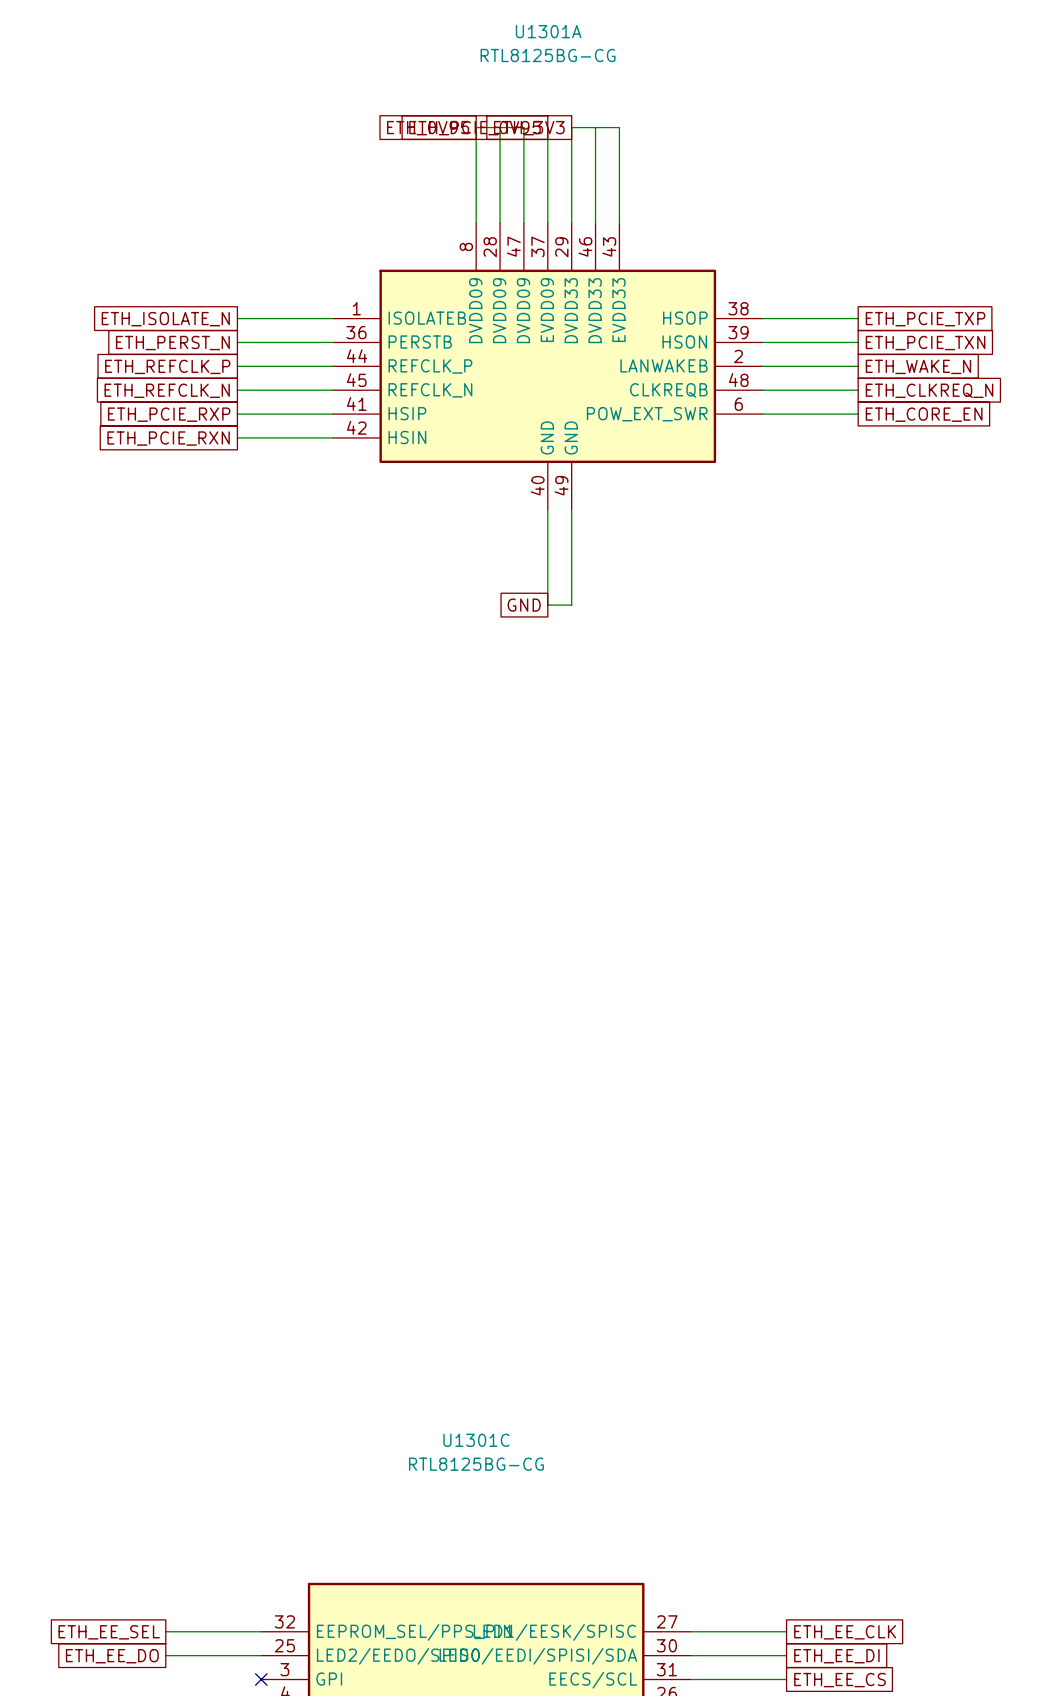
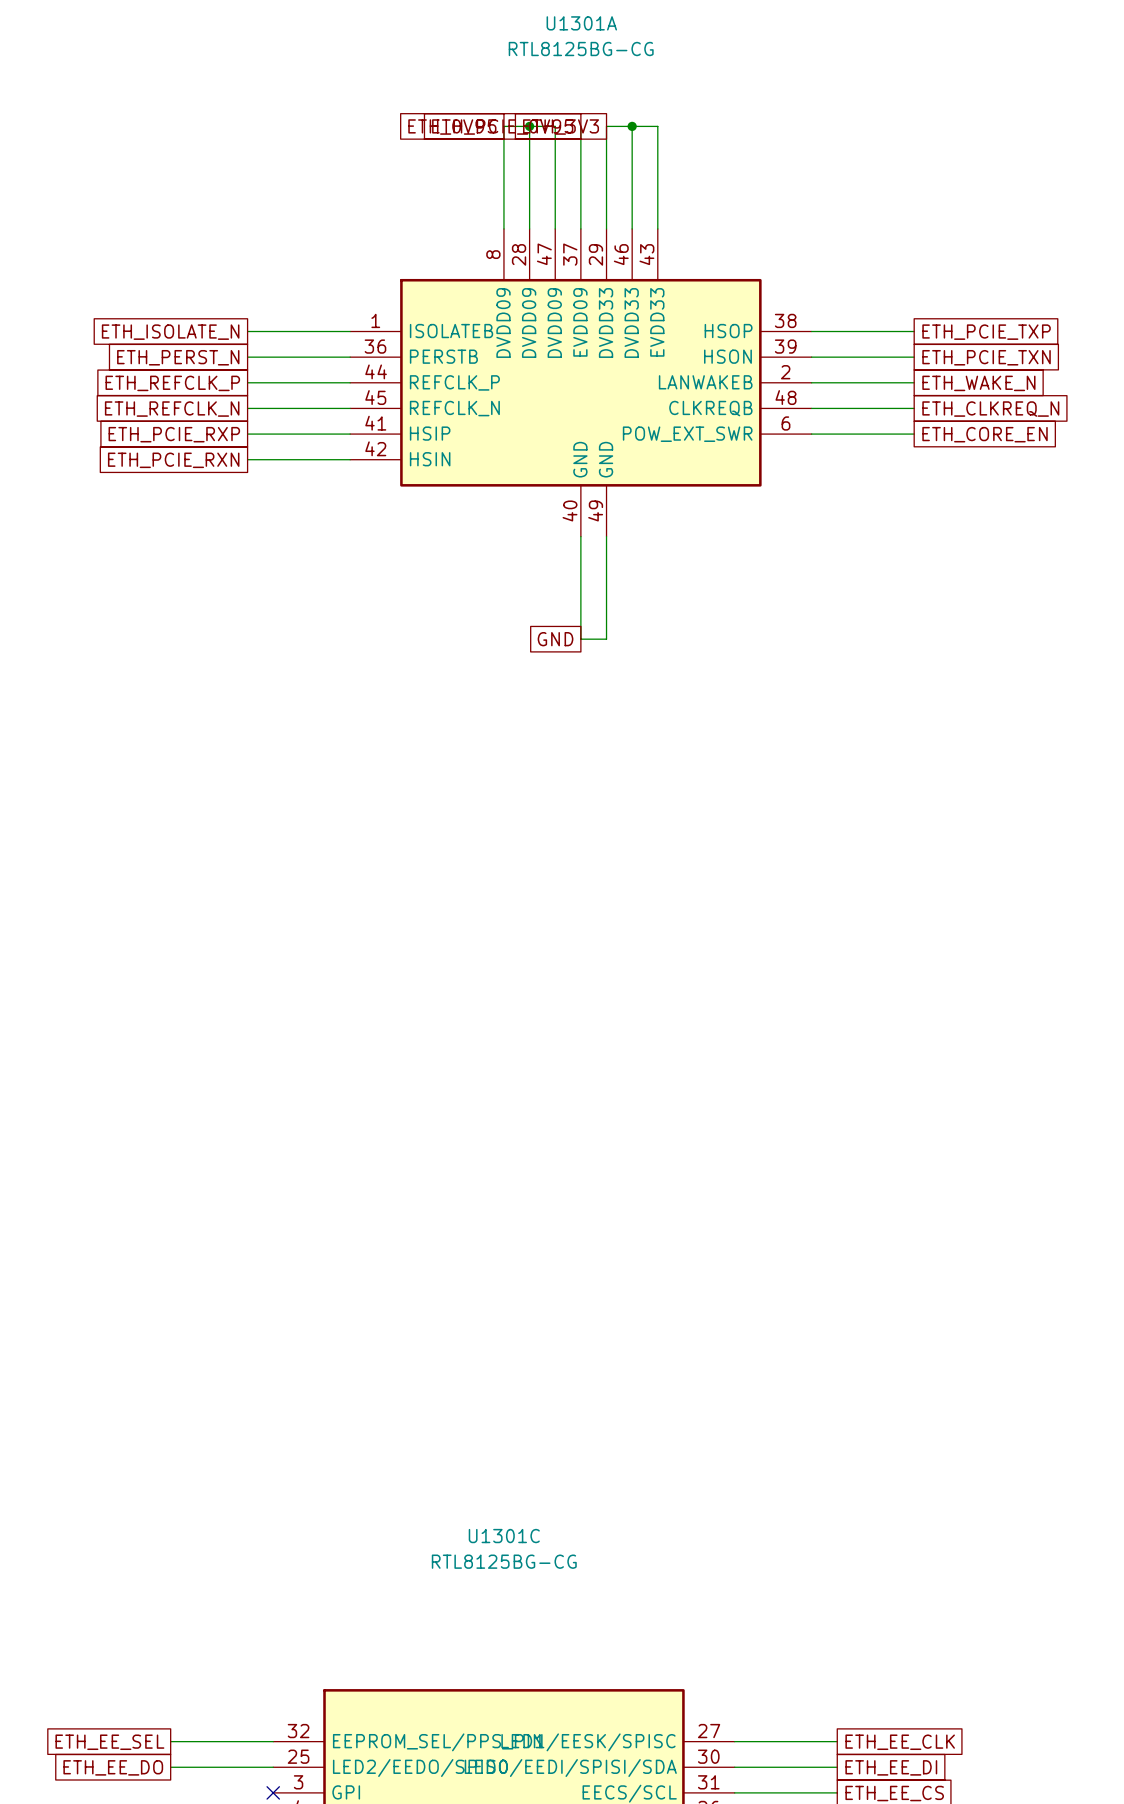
junction: none -> (529, 126)
junction: none -> (632, 126)

